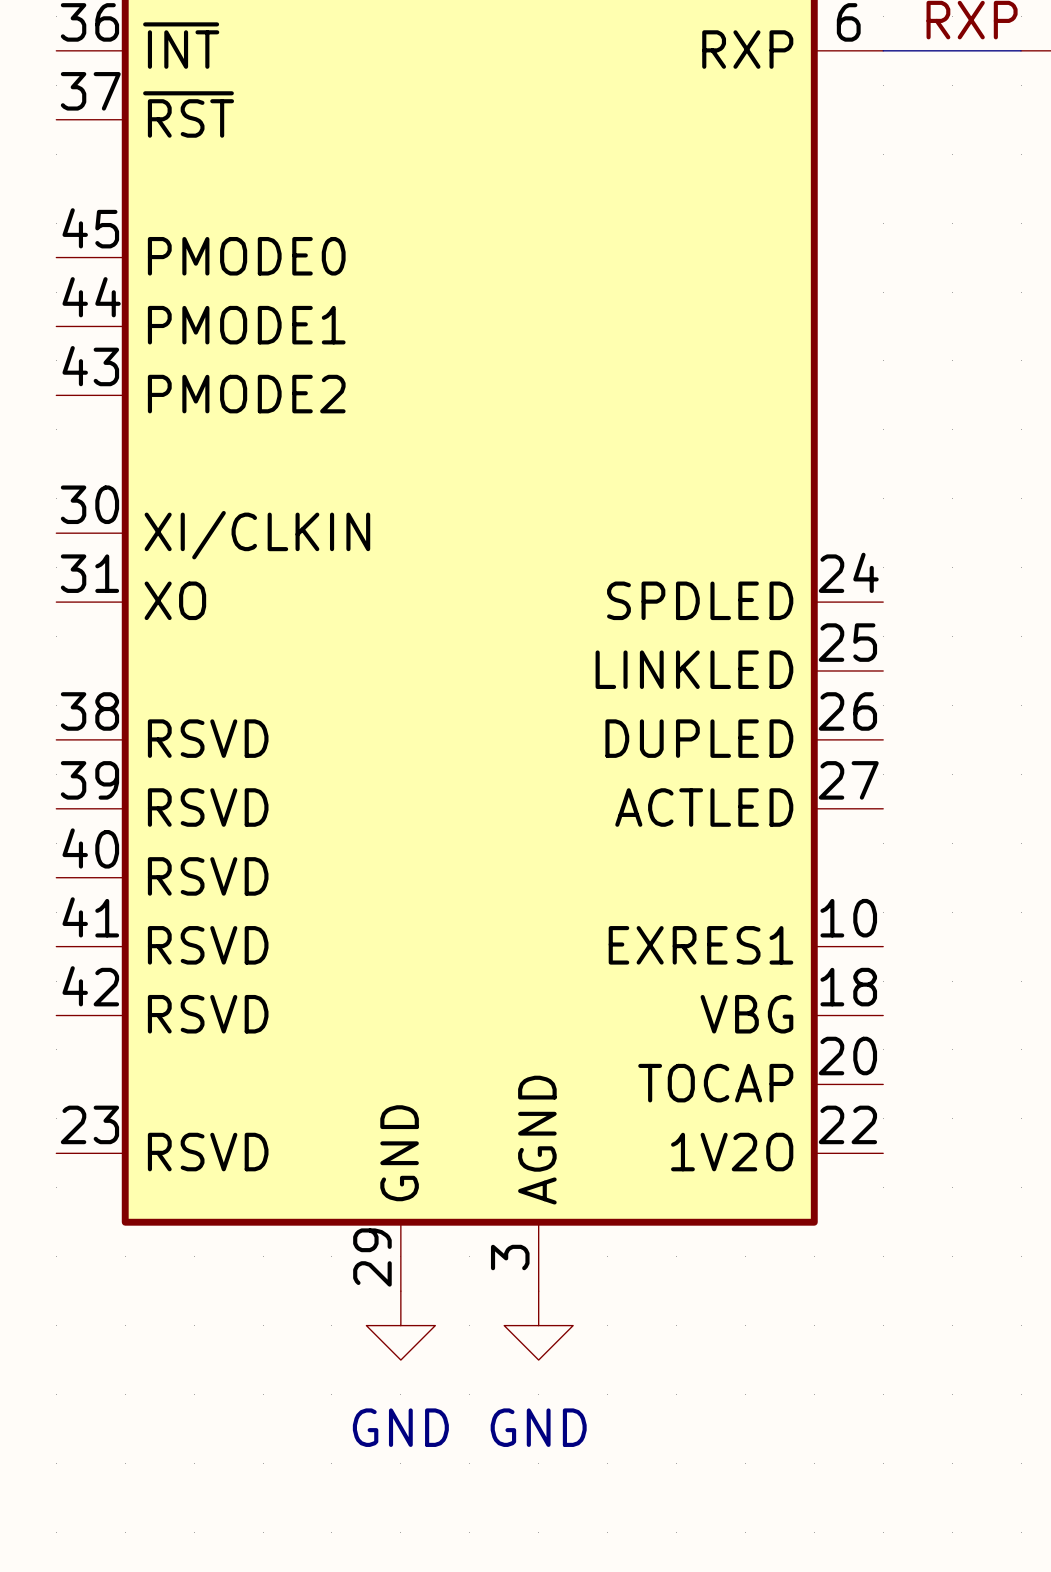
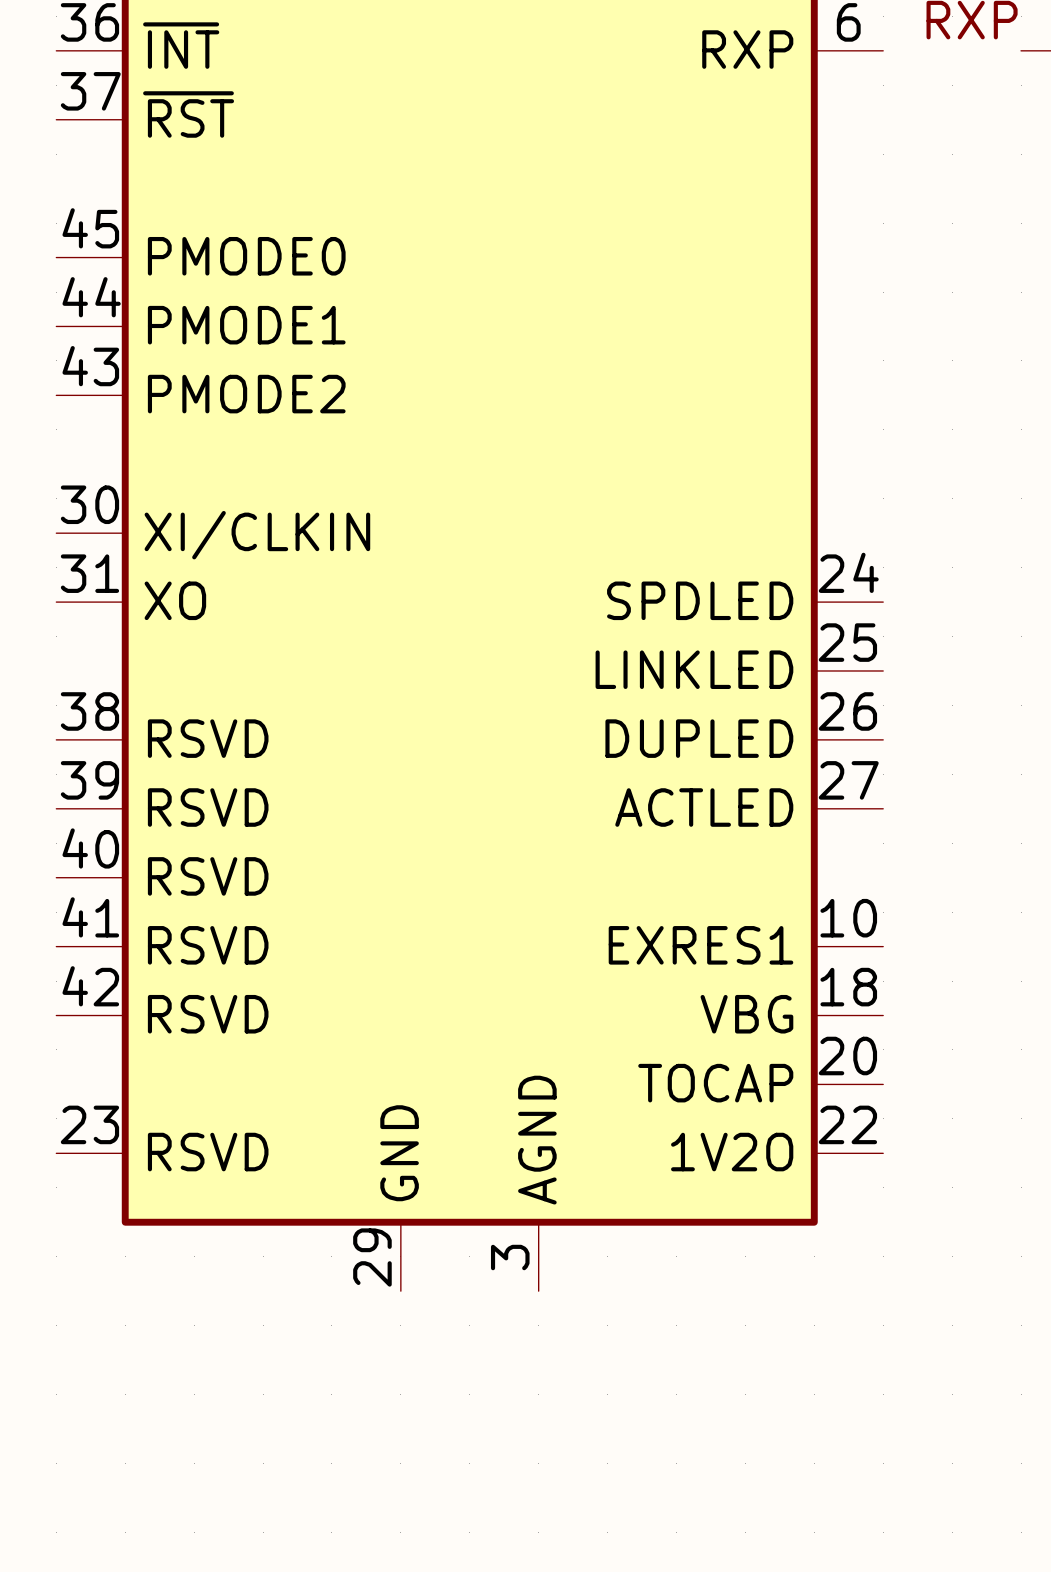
wire: (883, 50) (1021, 50) -> none
power symbol: GND (400, 1325) -> none
power symbol: GND (538, 1325) -> none

